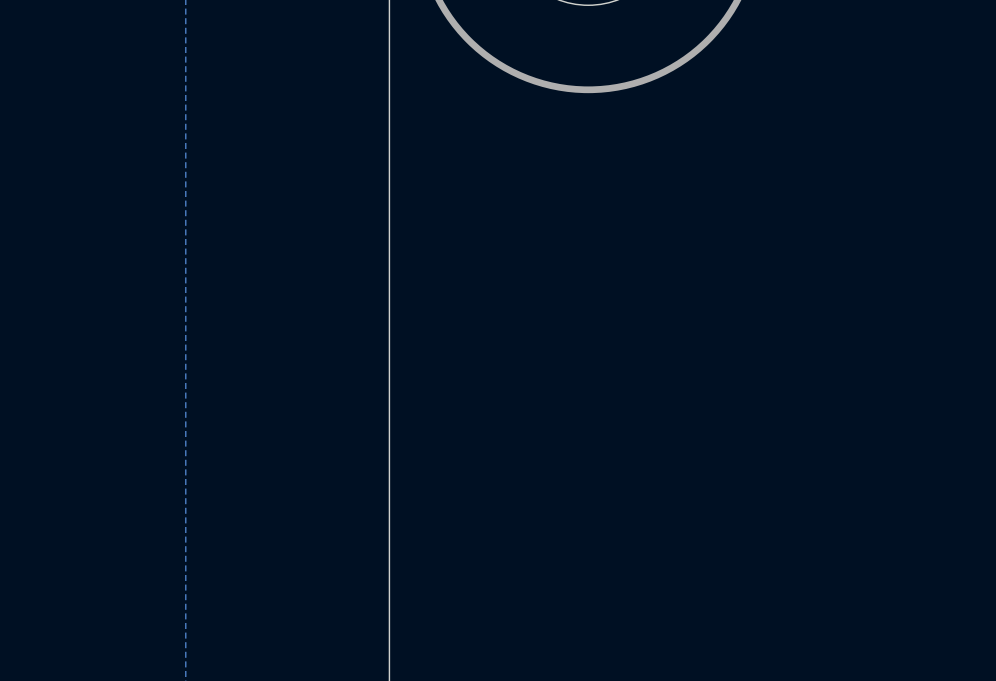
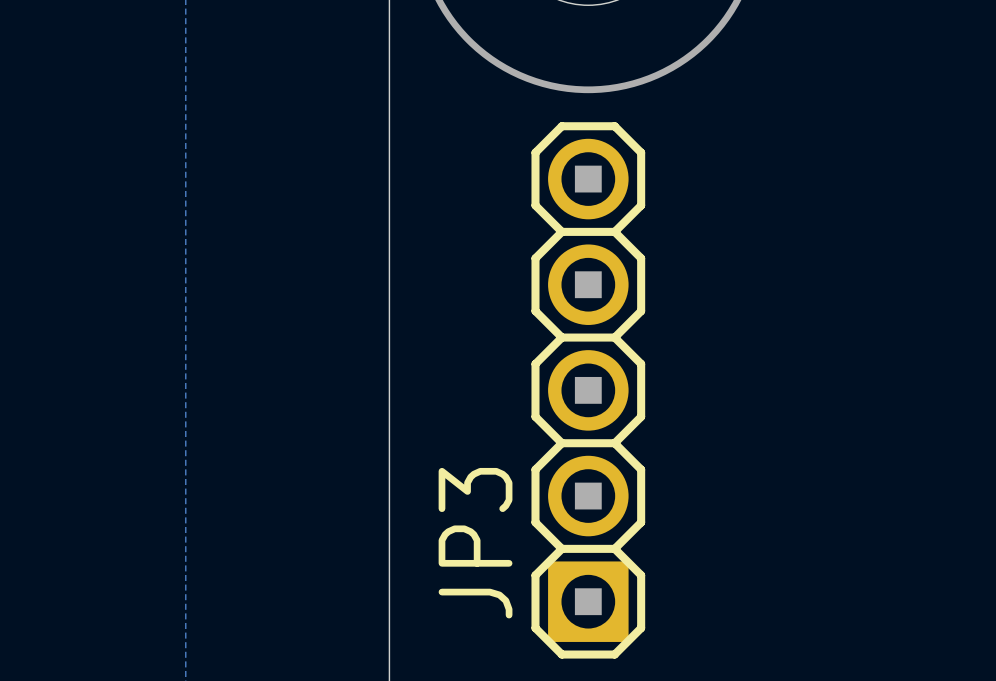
JP3: none -> (588, 390)

